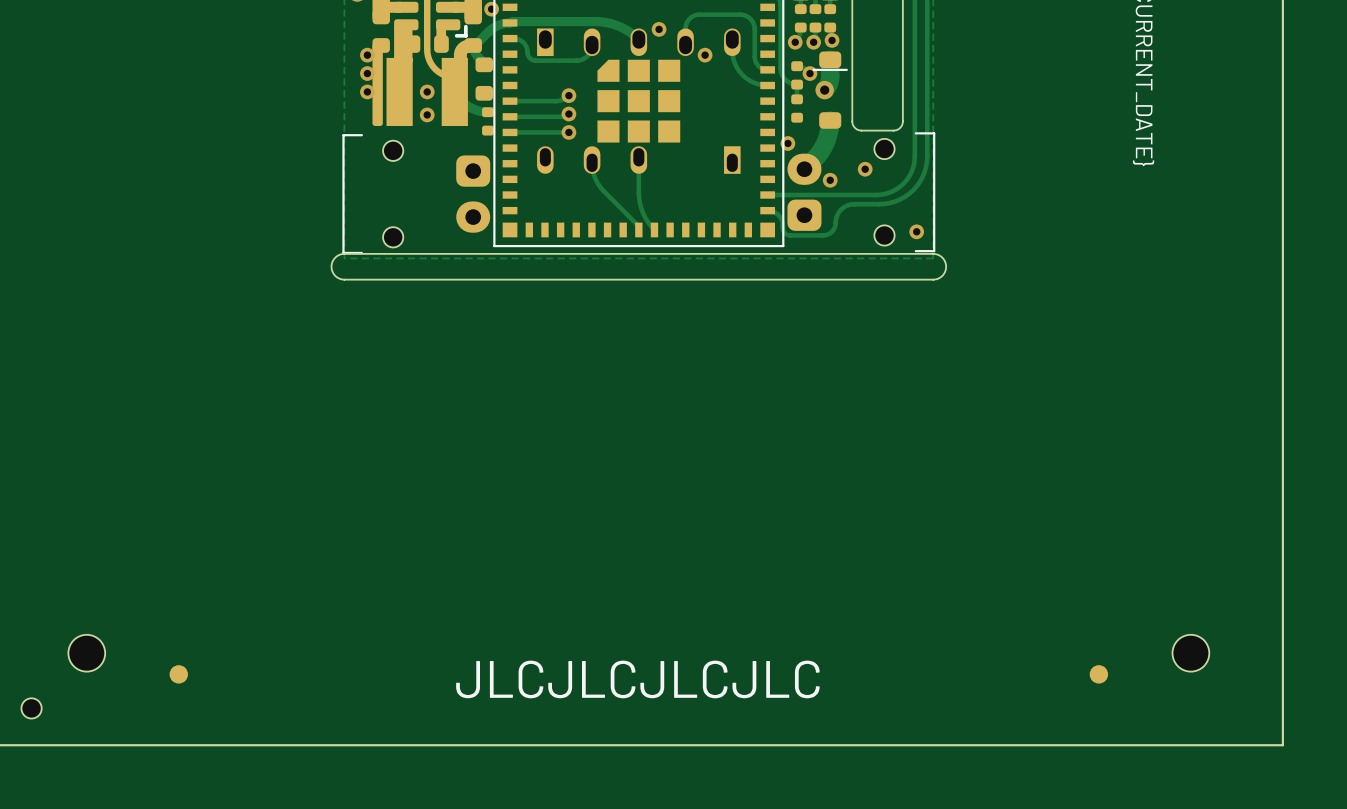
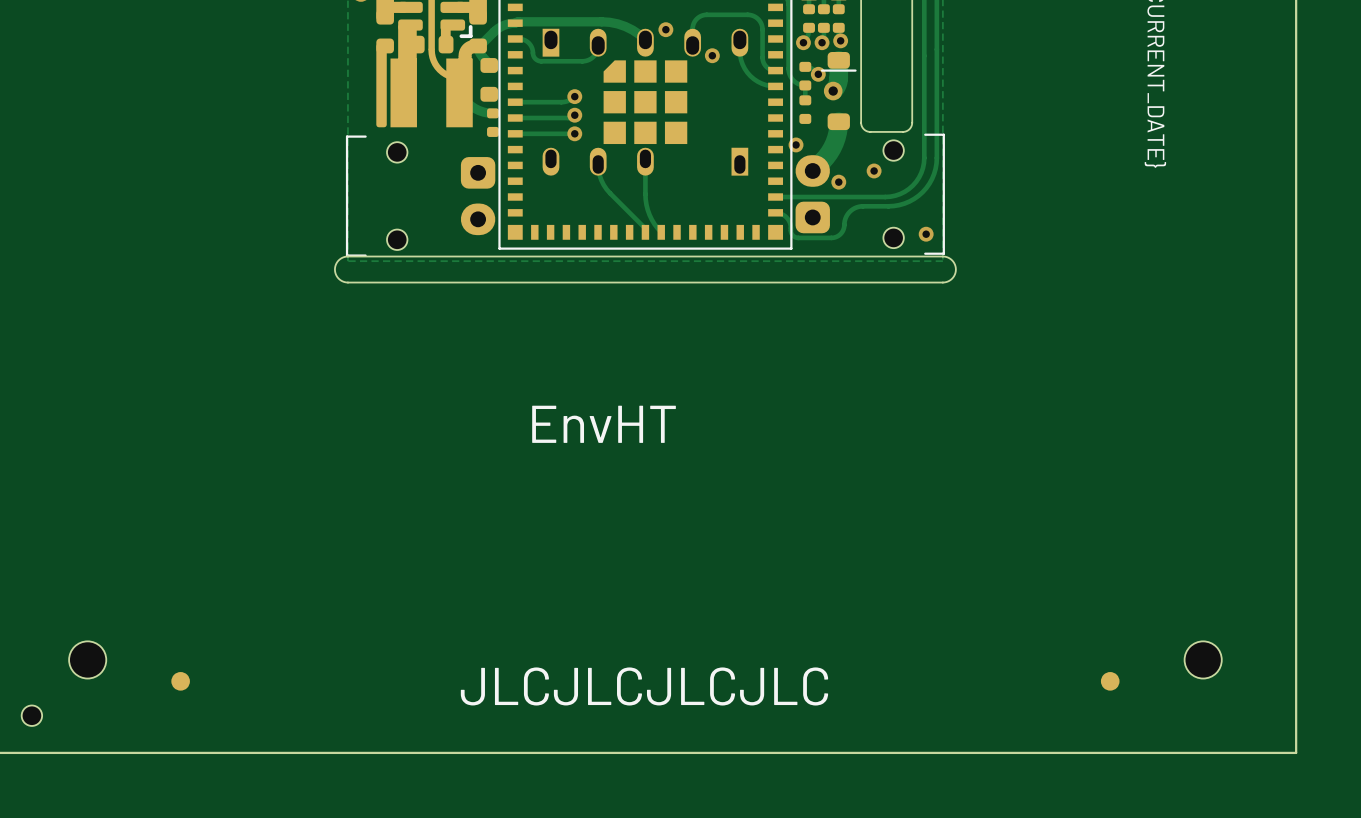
via: (491, 9) -> none
via: (367, 55) -> none
via: (367, 73) -> none
via: (367, 91) -> none
via: (427, 91) -> none
via: (427, 114) -> none
text: none -> EnvHT (604, 424)

